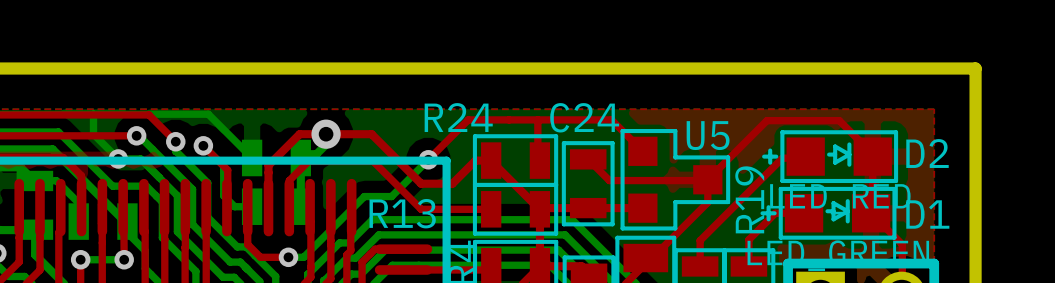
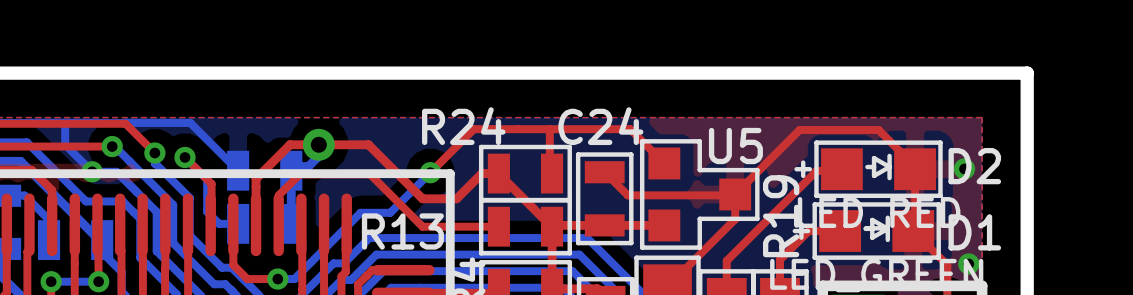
via: none -> (964, 168)
via: none -> (968, 263)

